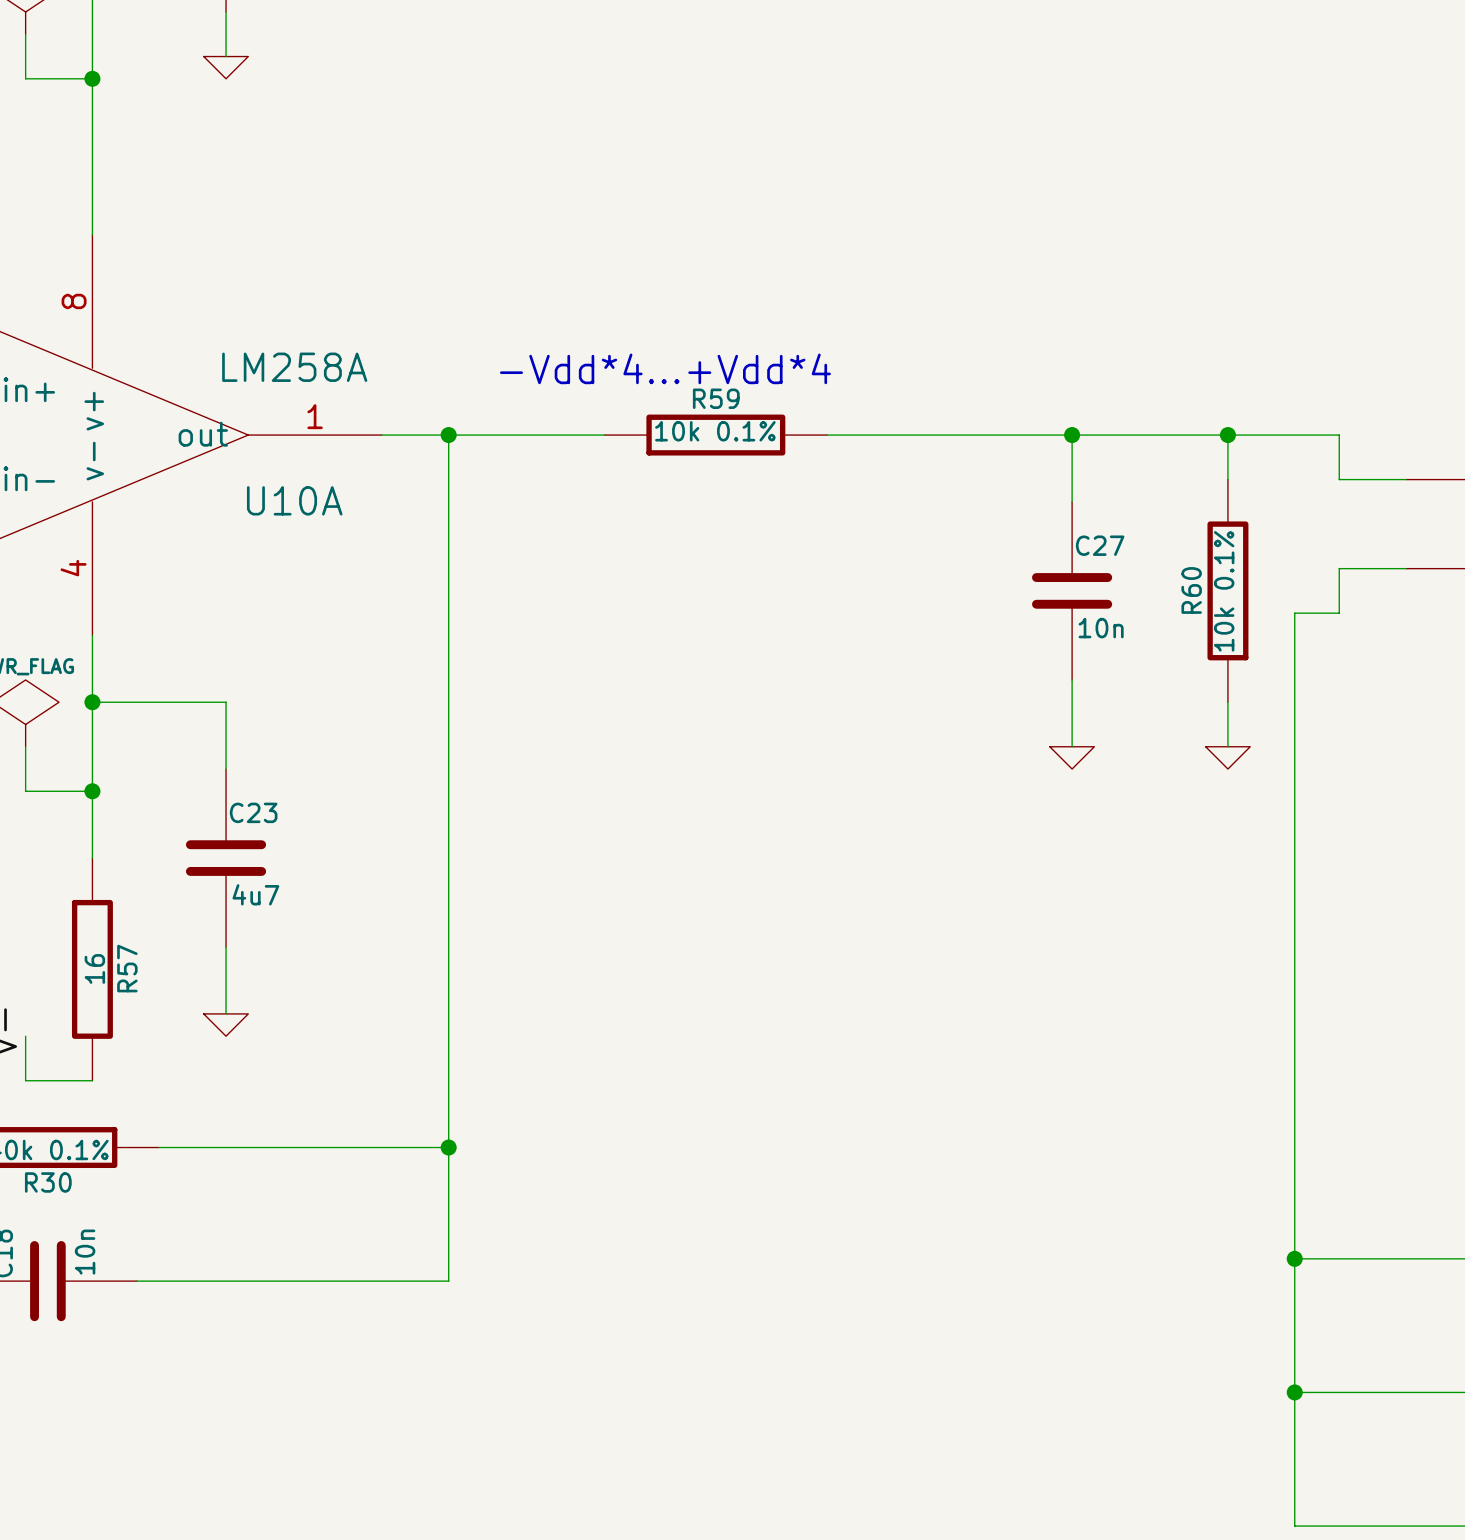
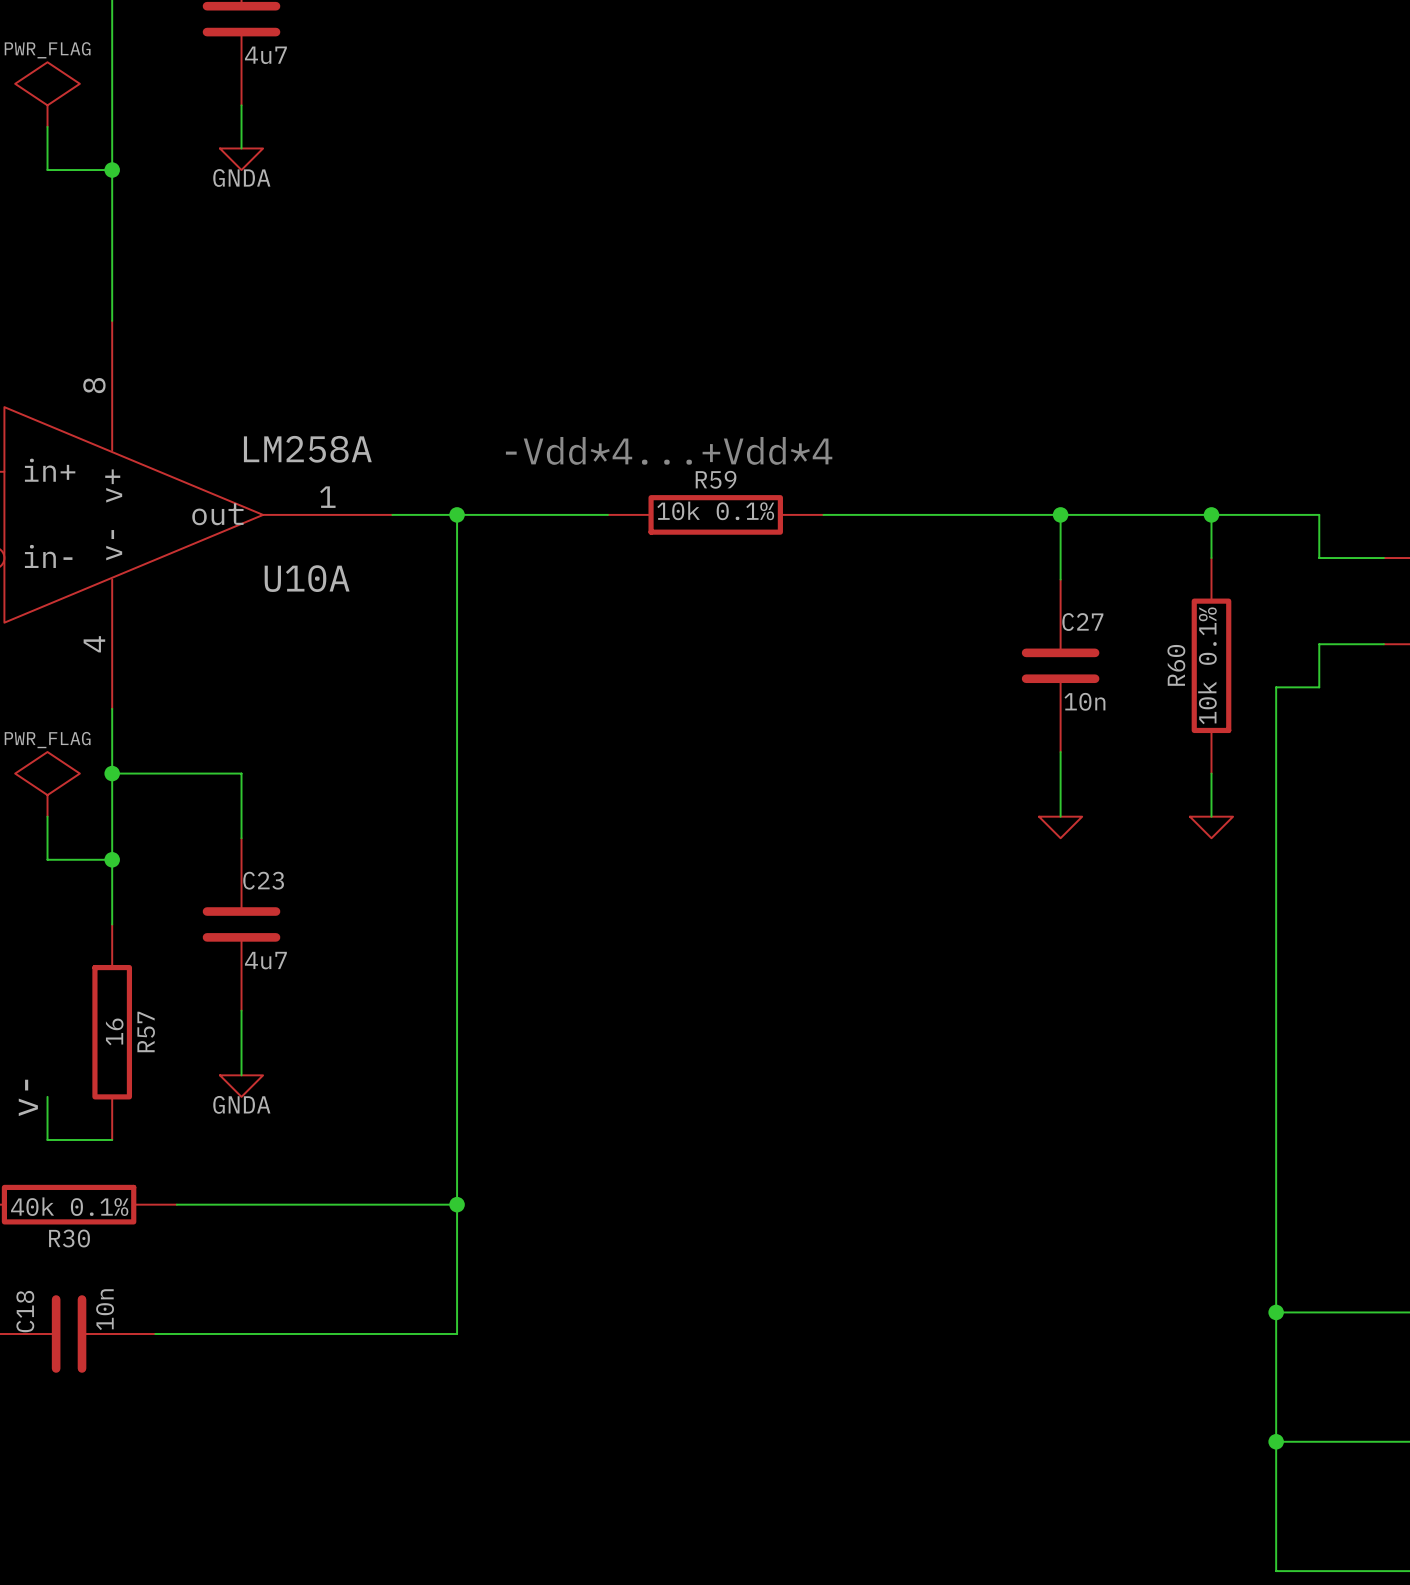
power symbol text: none -> GNDA (241, 178)
power symbol text: none -> GNDA (241, 1104)

